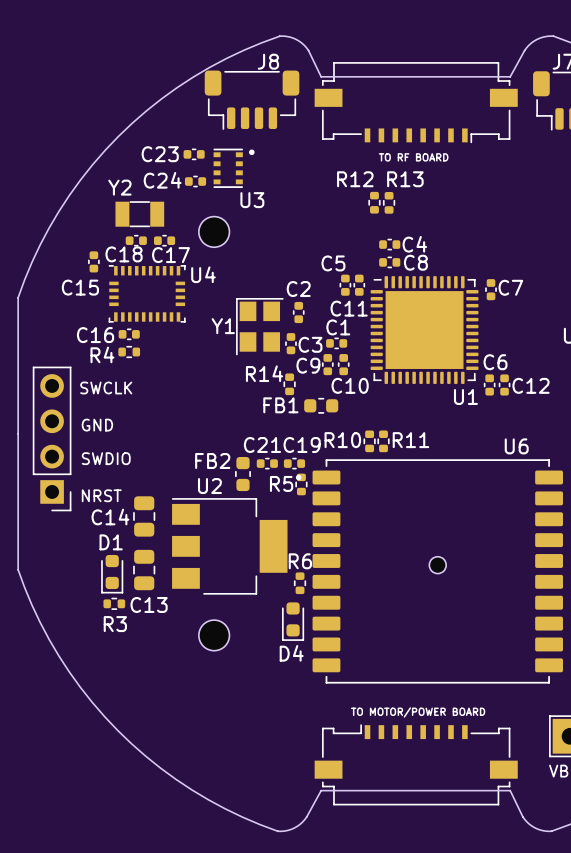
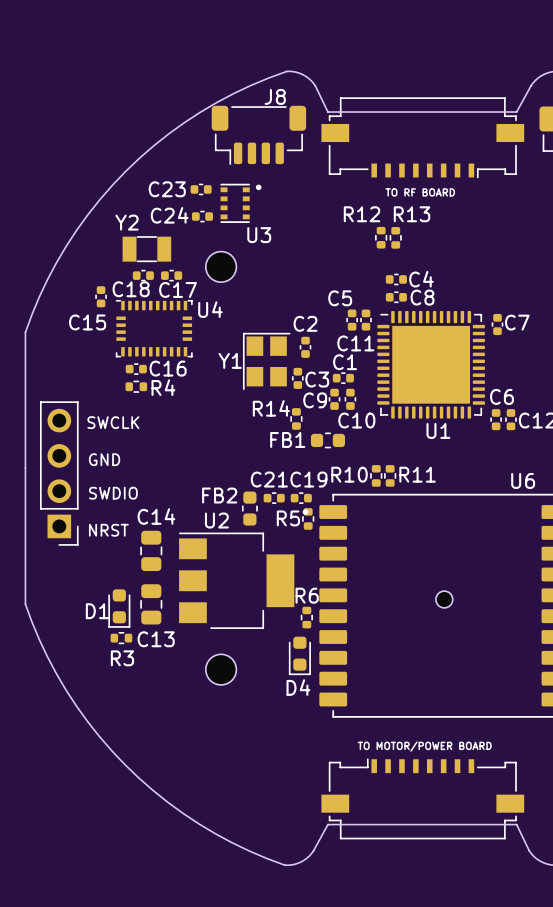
C16 name position: C16 (95, 335) -> C16 (168, 368)
R4 name position: R4 (102, 354) -> R4 (163, 387)
U1 name position: U1 (465, 396) -> U1 (438, 430)
C14 name position: C14 (110, 517) -> C14 (156, 516)
D1 name position: D1 (111, 542) -> D1 (97, 611)

